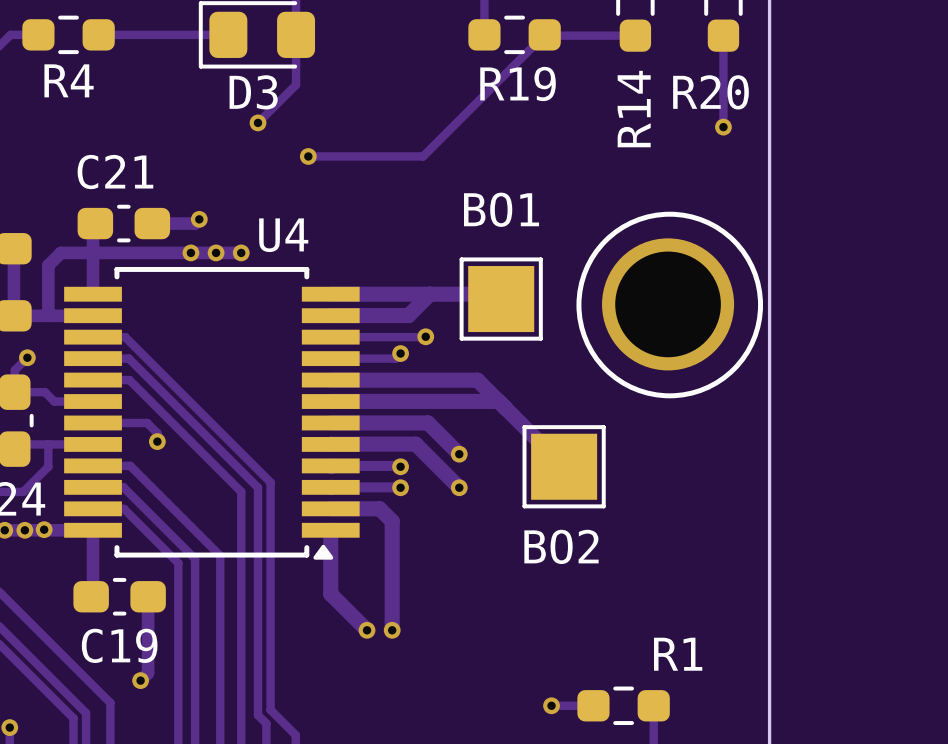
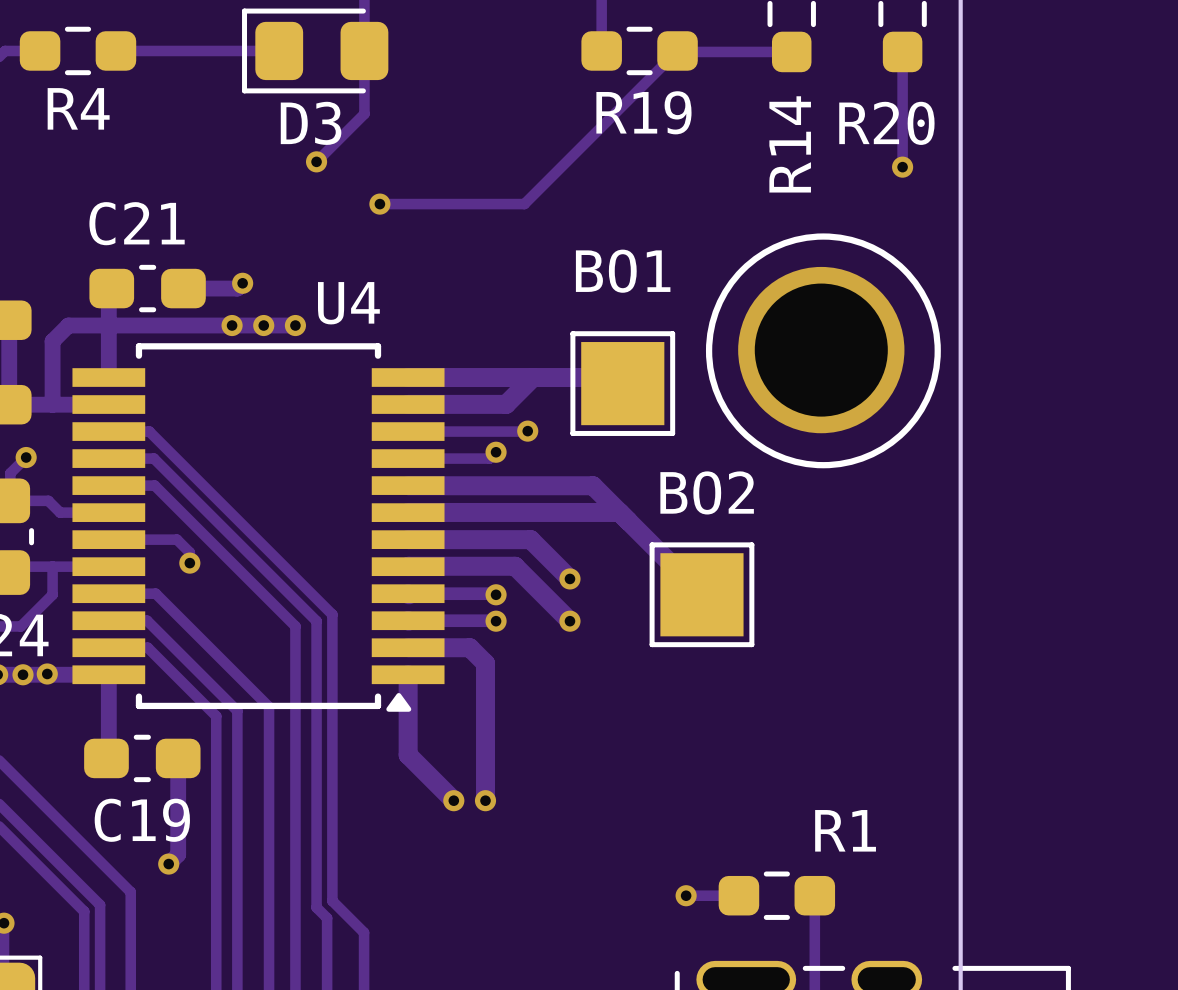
via position: (668, 304) -> (821, 350)
drawing position: (669, 305) -> (823, 350)
BO2 name position: BO2 (561, 546) -> BO2 (707, 492)

